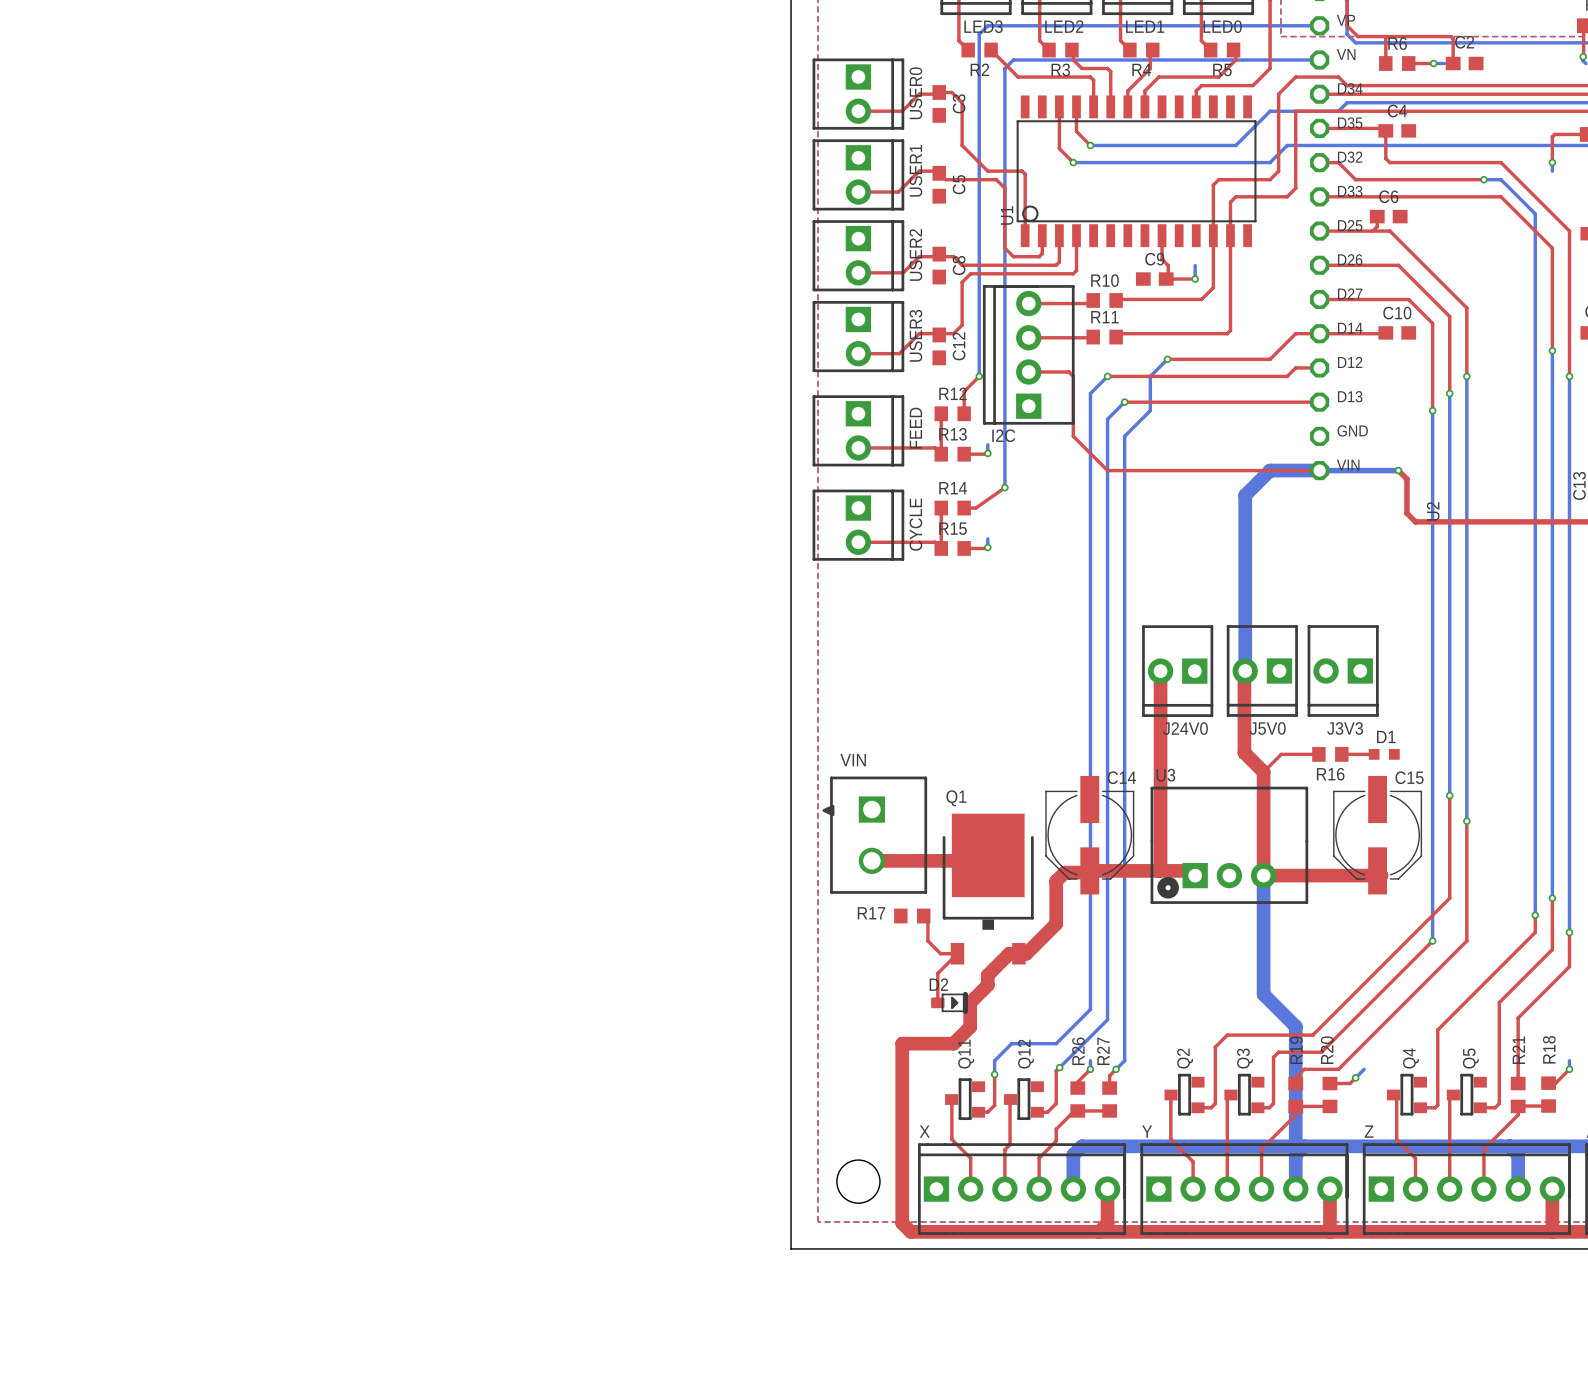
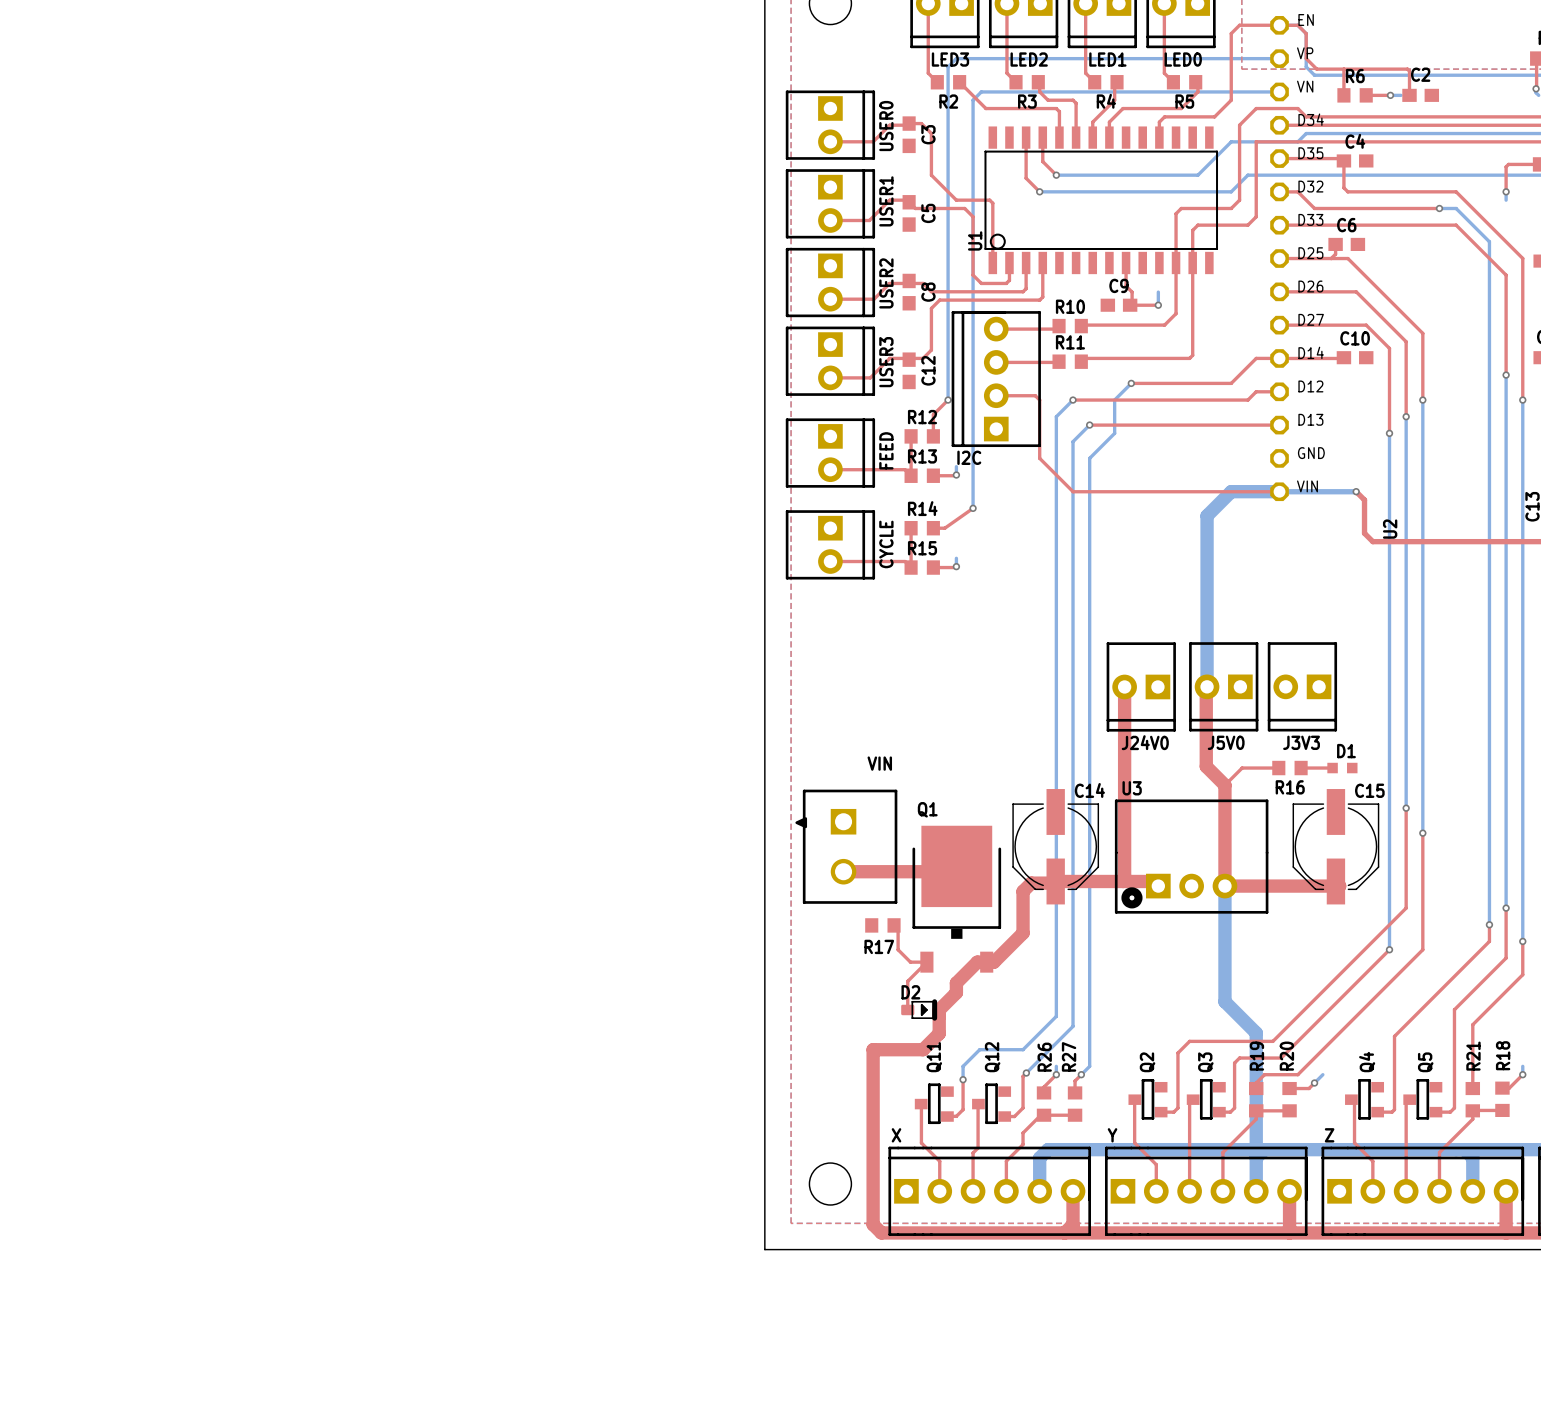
VIN name position: VIN (853, 760) -> VIN (879, 763)
R17 name position: R17 (871, 913) -> R17 (879, 946)

